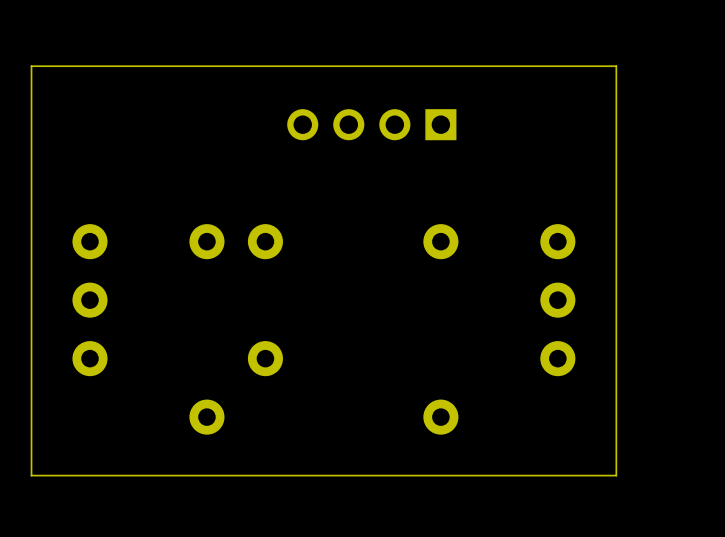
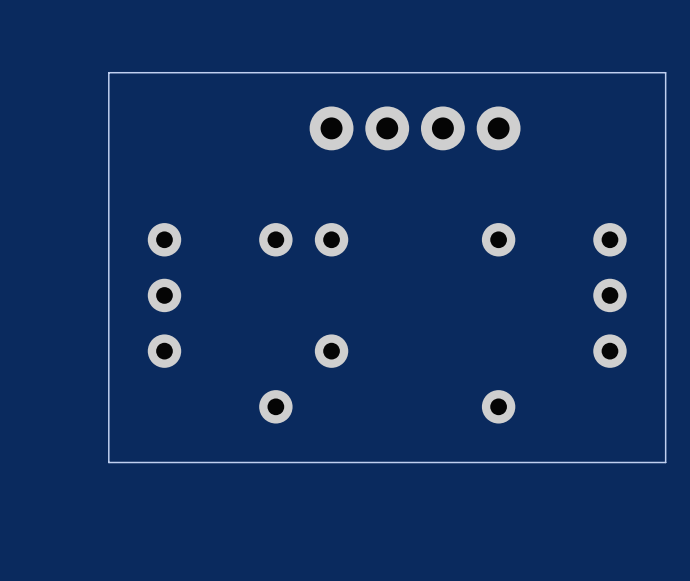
part footprint: [287, 109, 457, 141] -> [420, 106, 465, 151]
part: none -> (331, 128)
part: none -> (387, 128)
part: none -> (498, 128)

